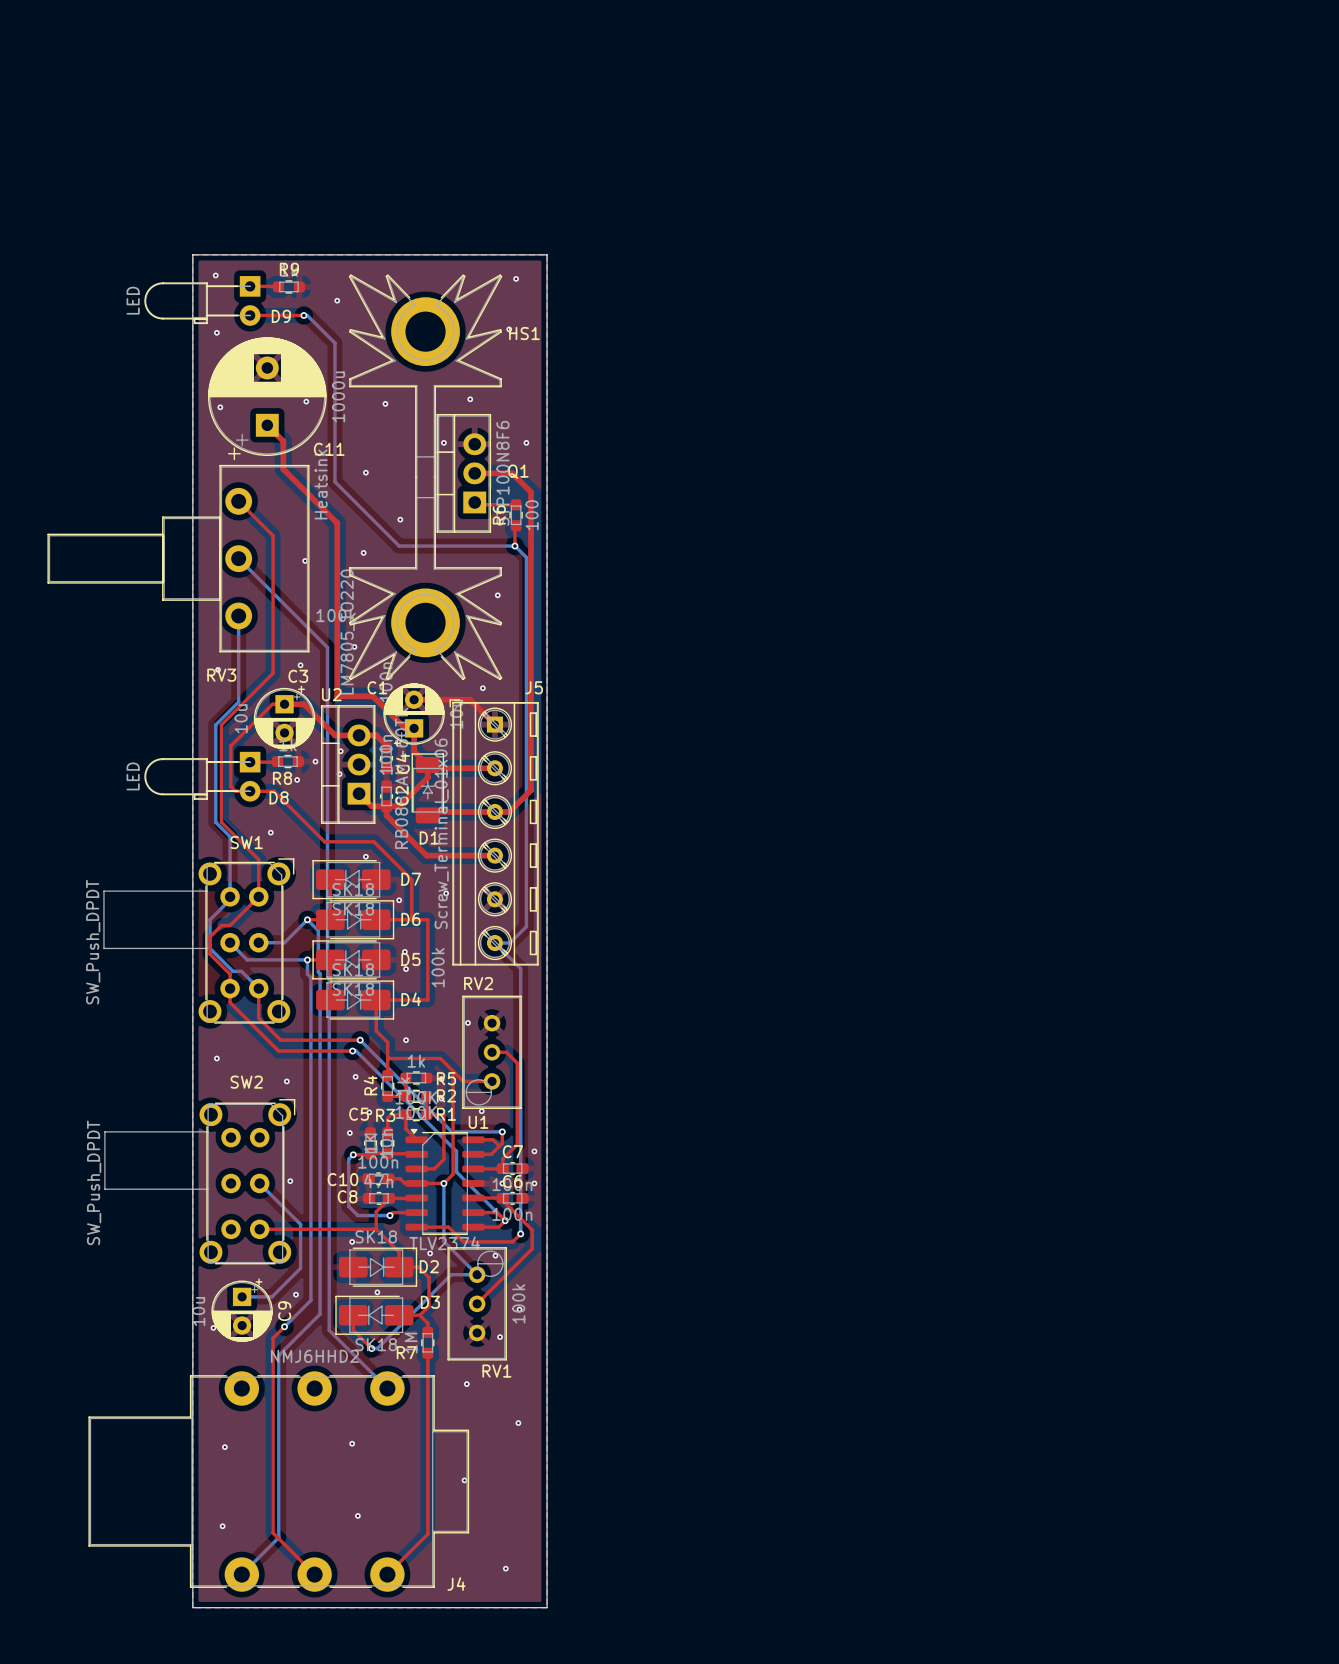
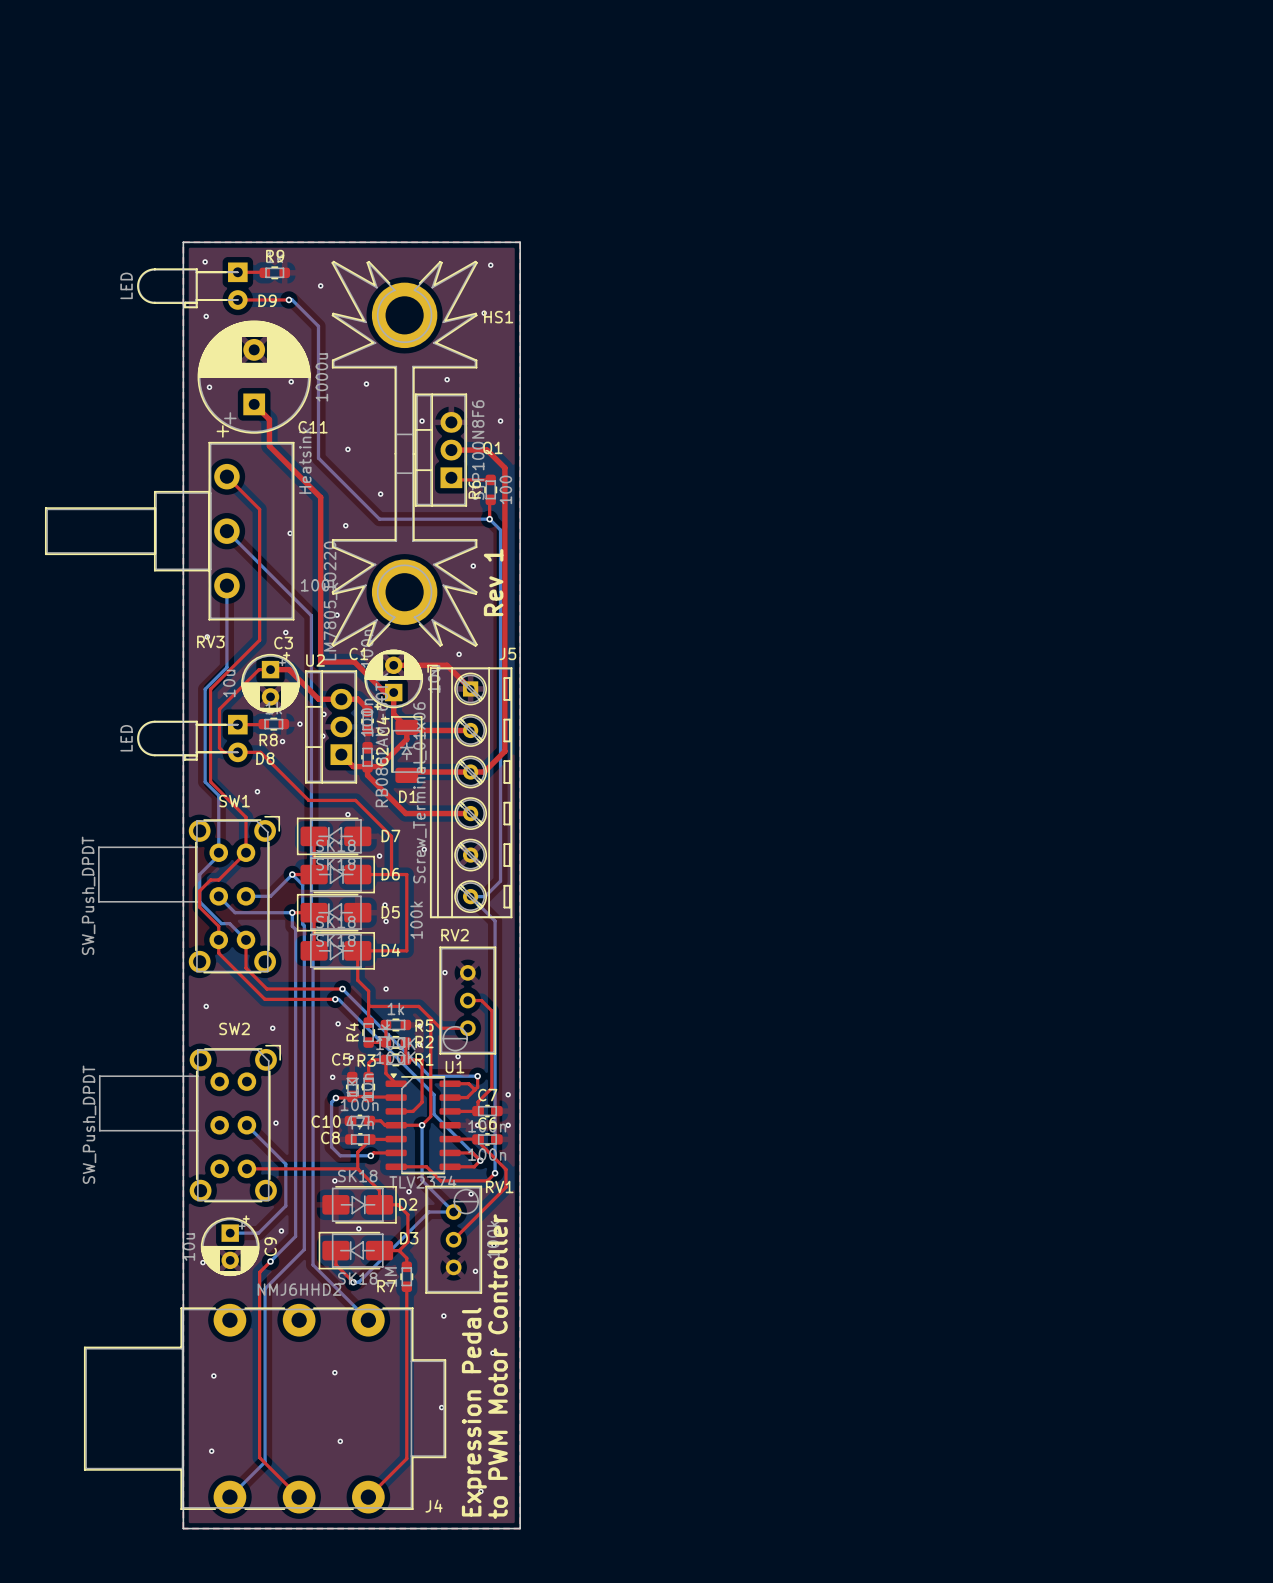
text: none -> Rev 1 (493, 582)
RV1 name position: RV1 (496, 1371) -> RV1 (499, 1186)
text: none -> to PWM Motor Controller (497, 1366)
text: none -> Expression Pedal (474, 1412)

